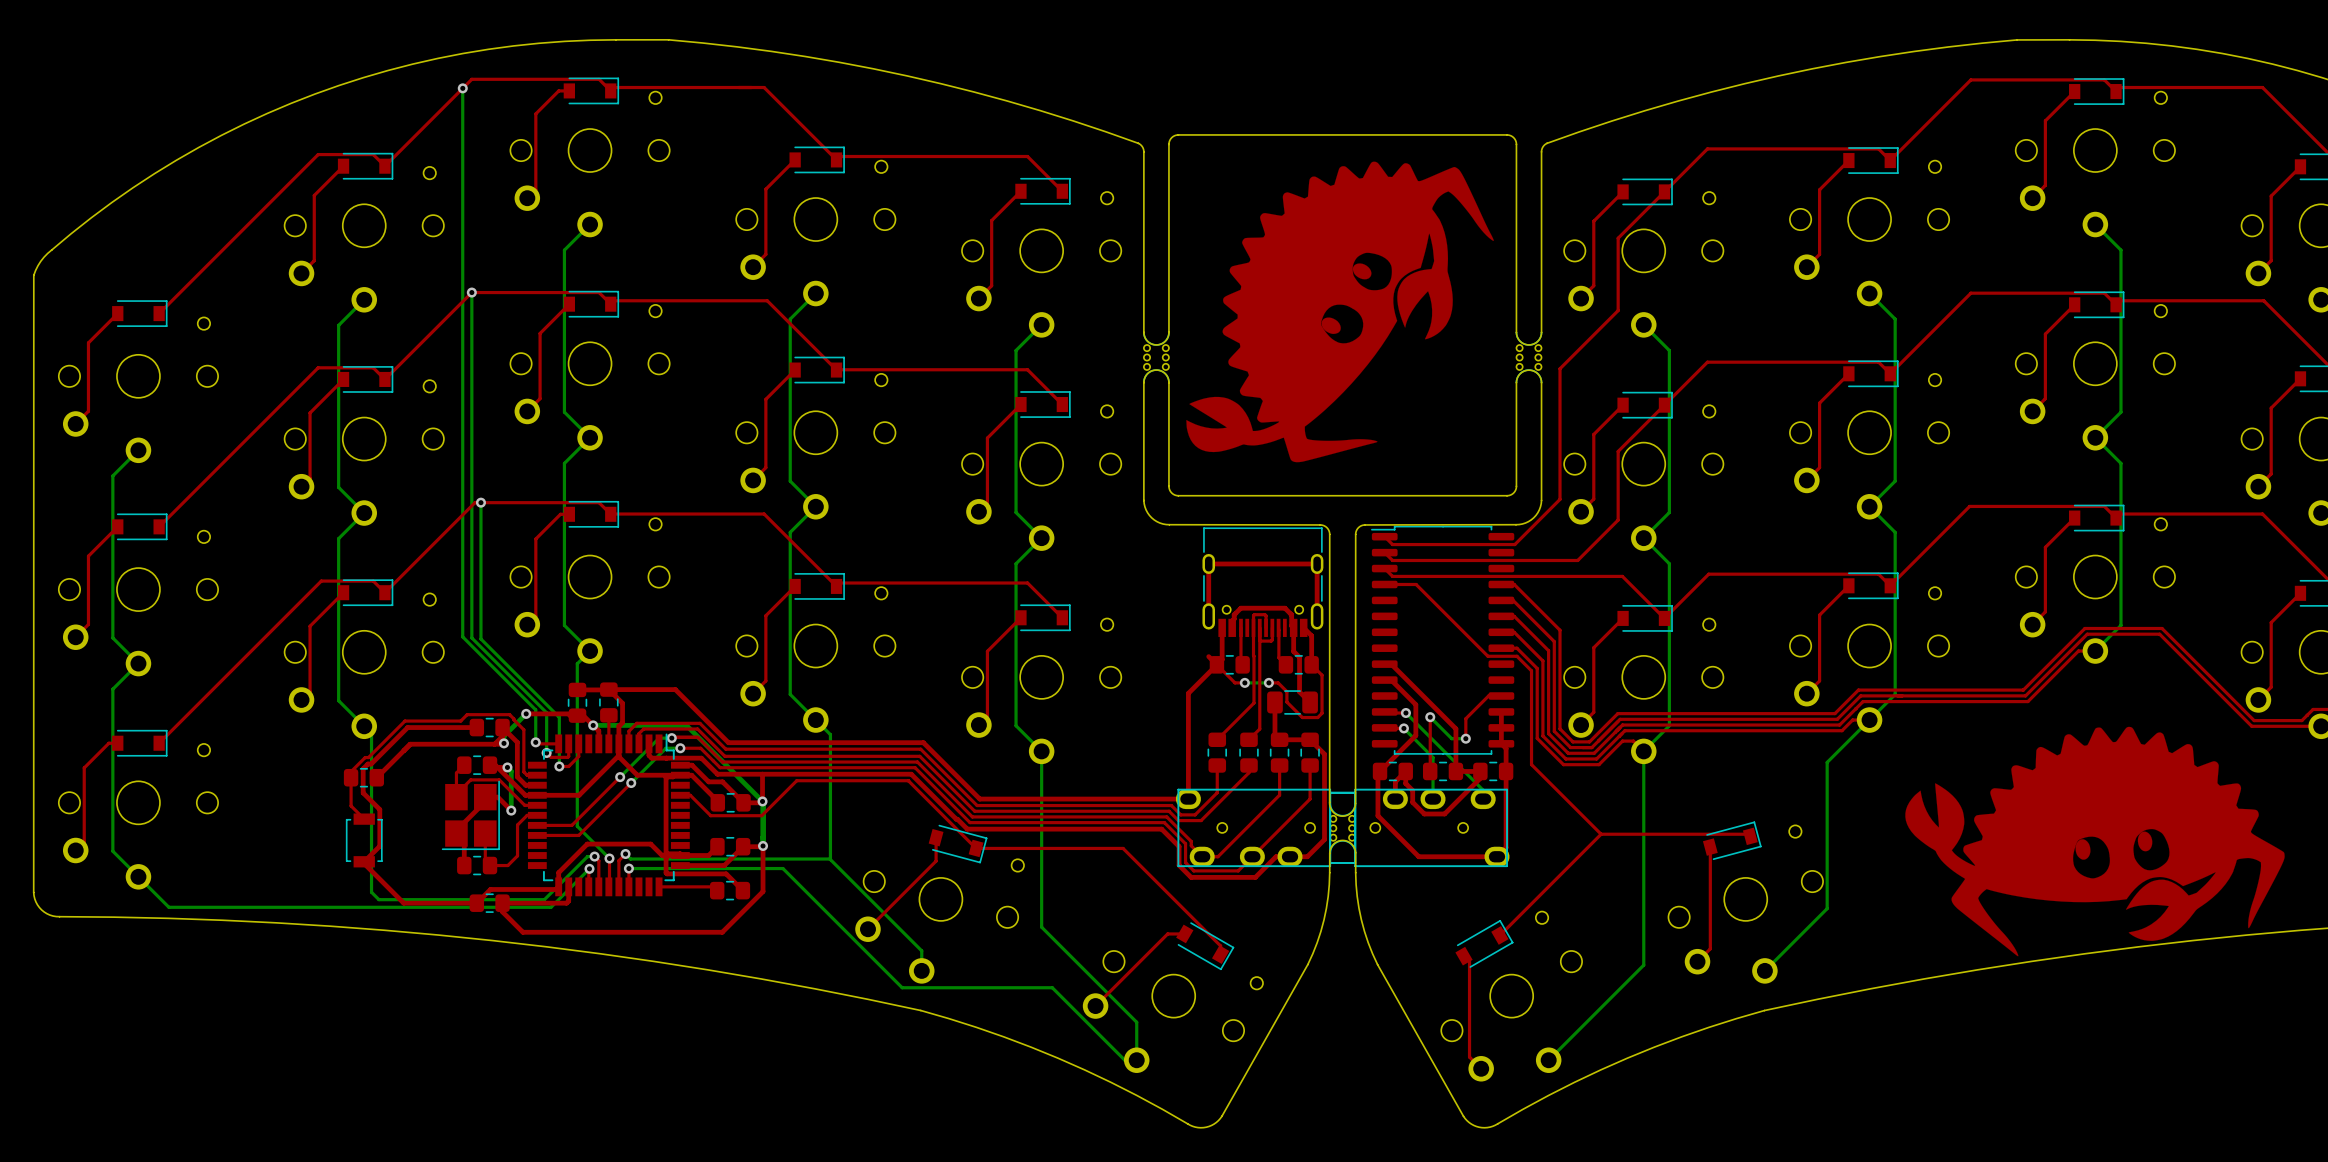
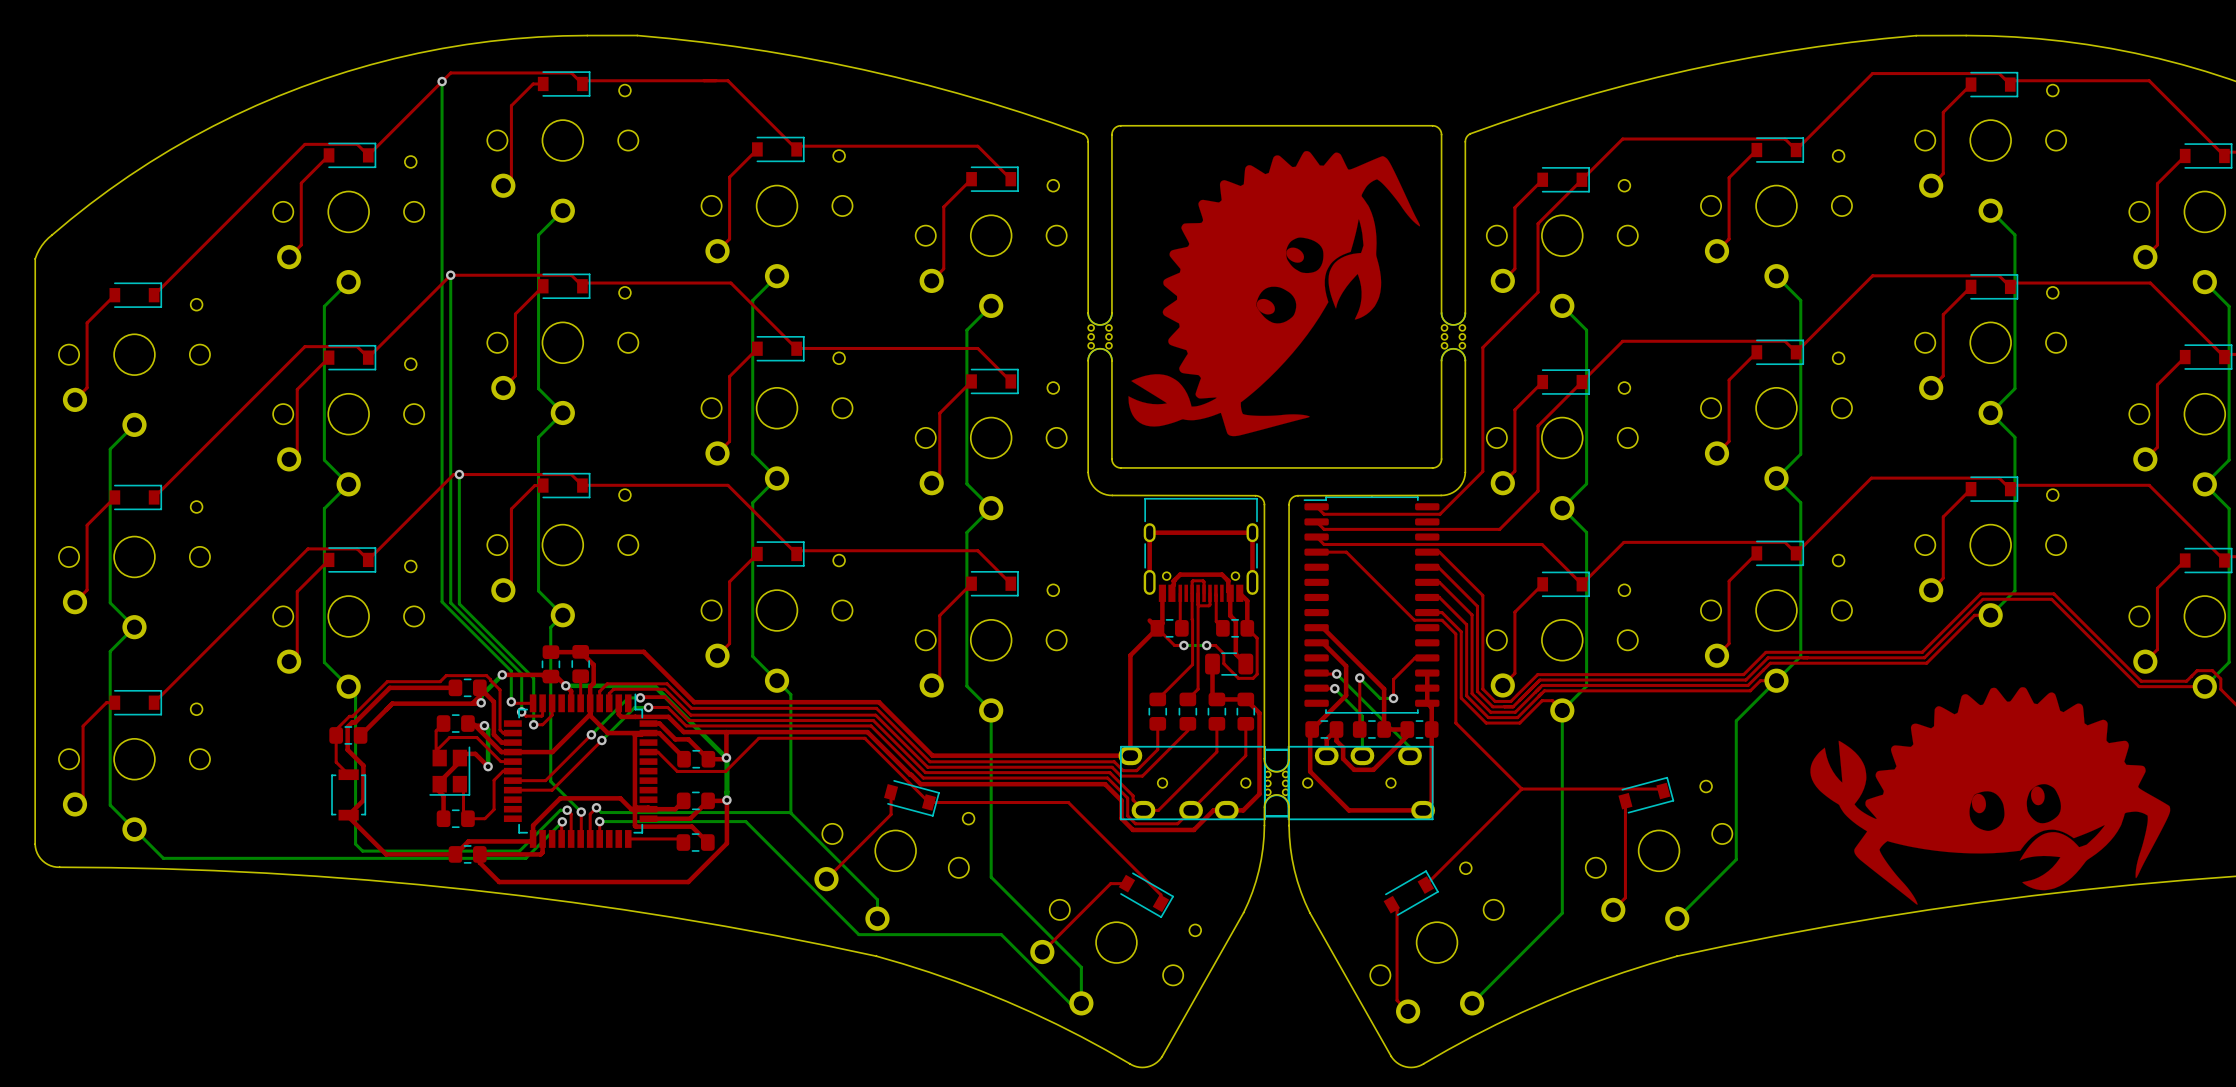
part footprint: [441, 780, 500, 850] -> [429, 746, 471, 796]

